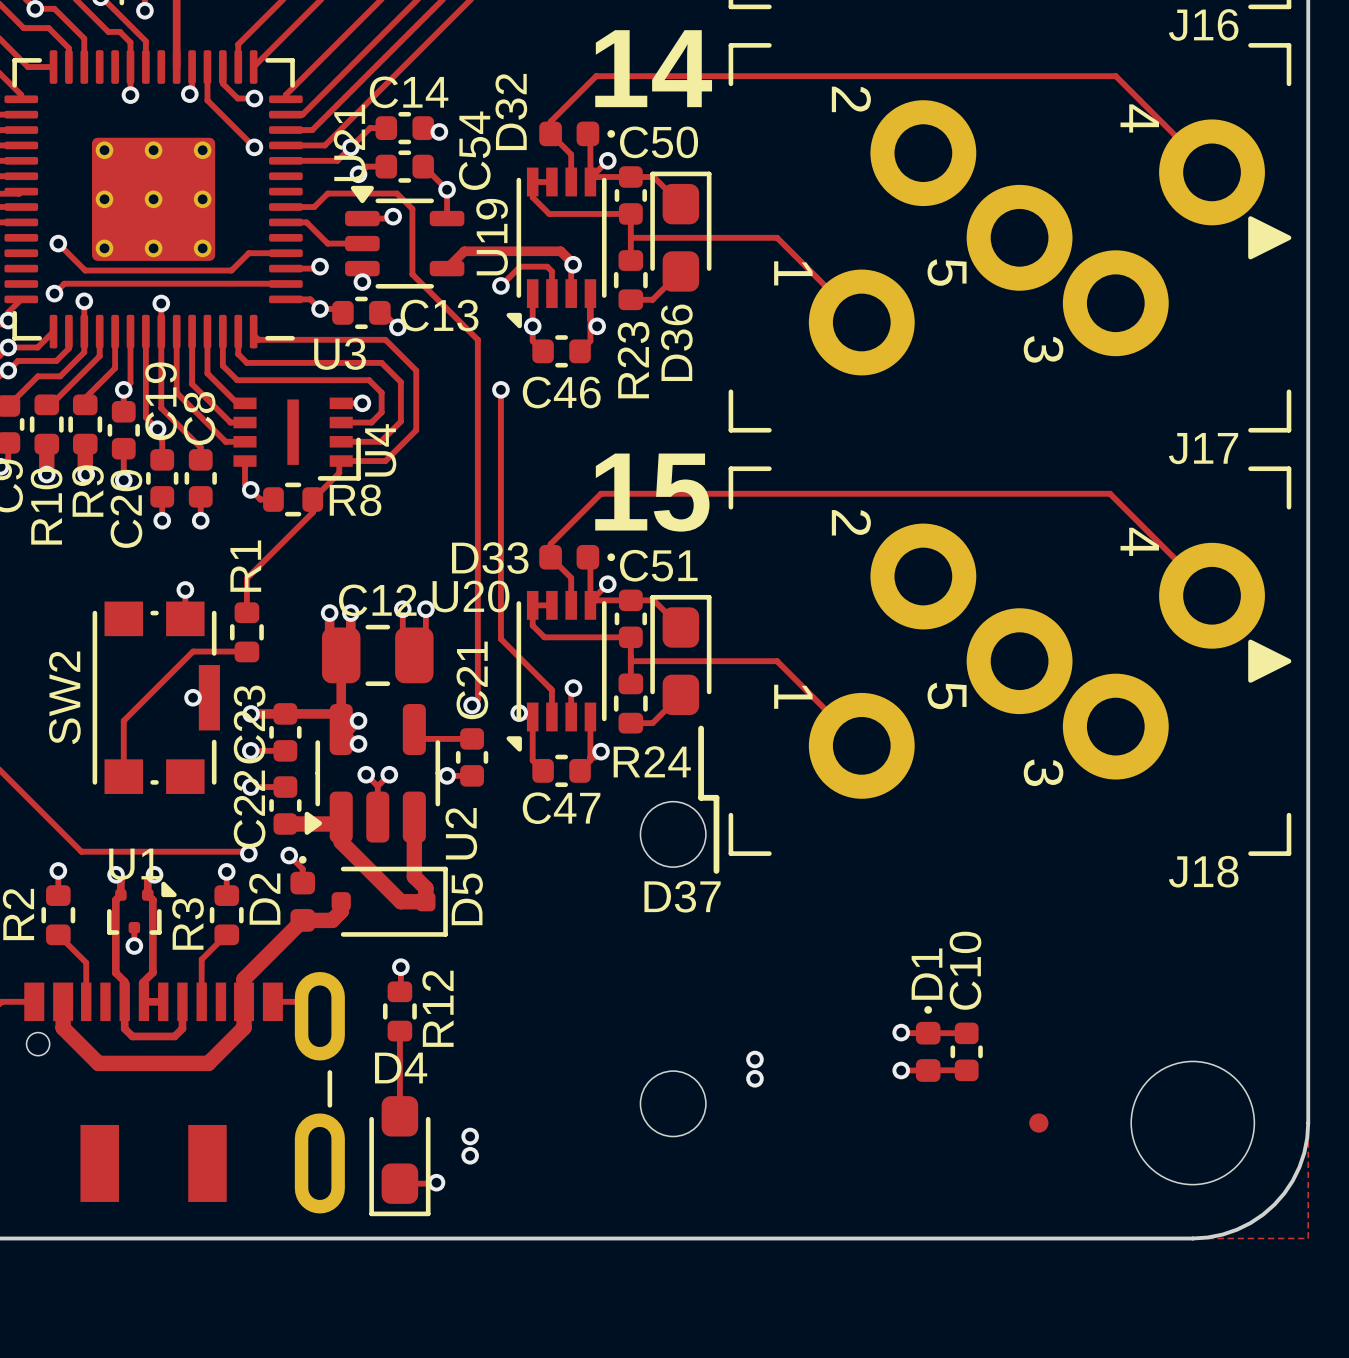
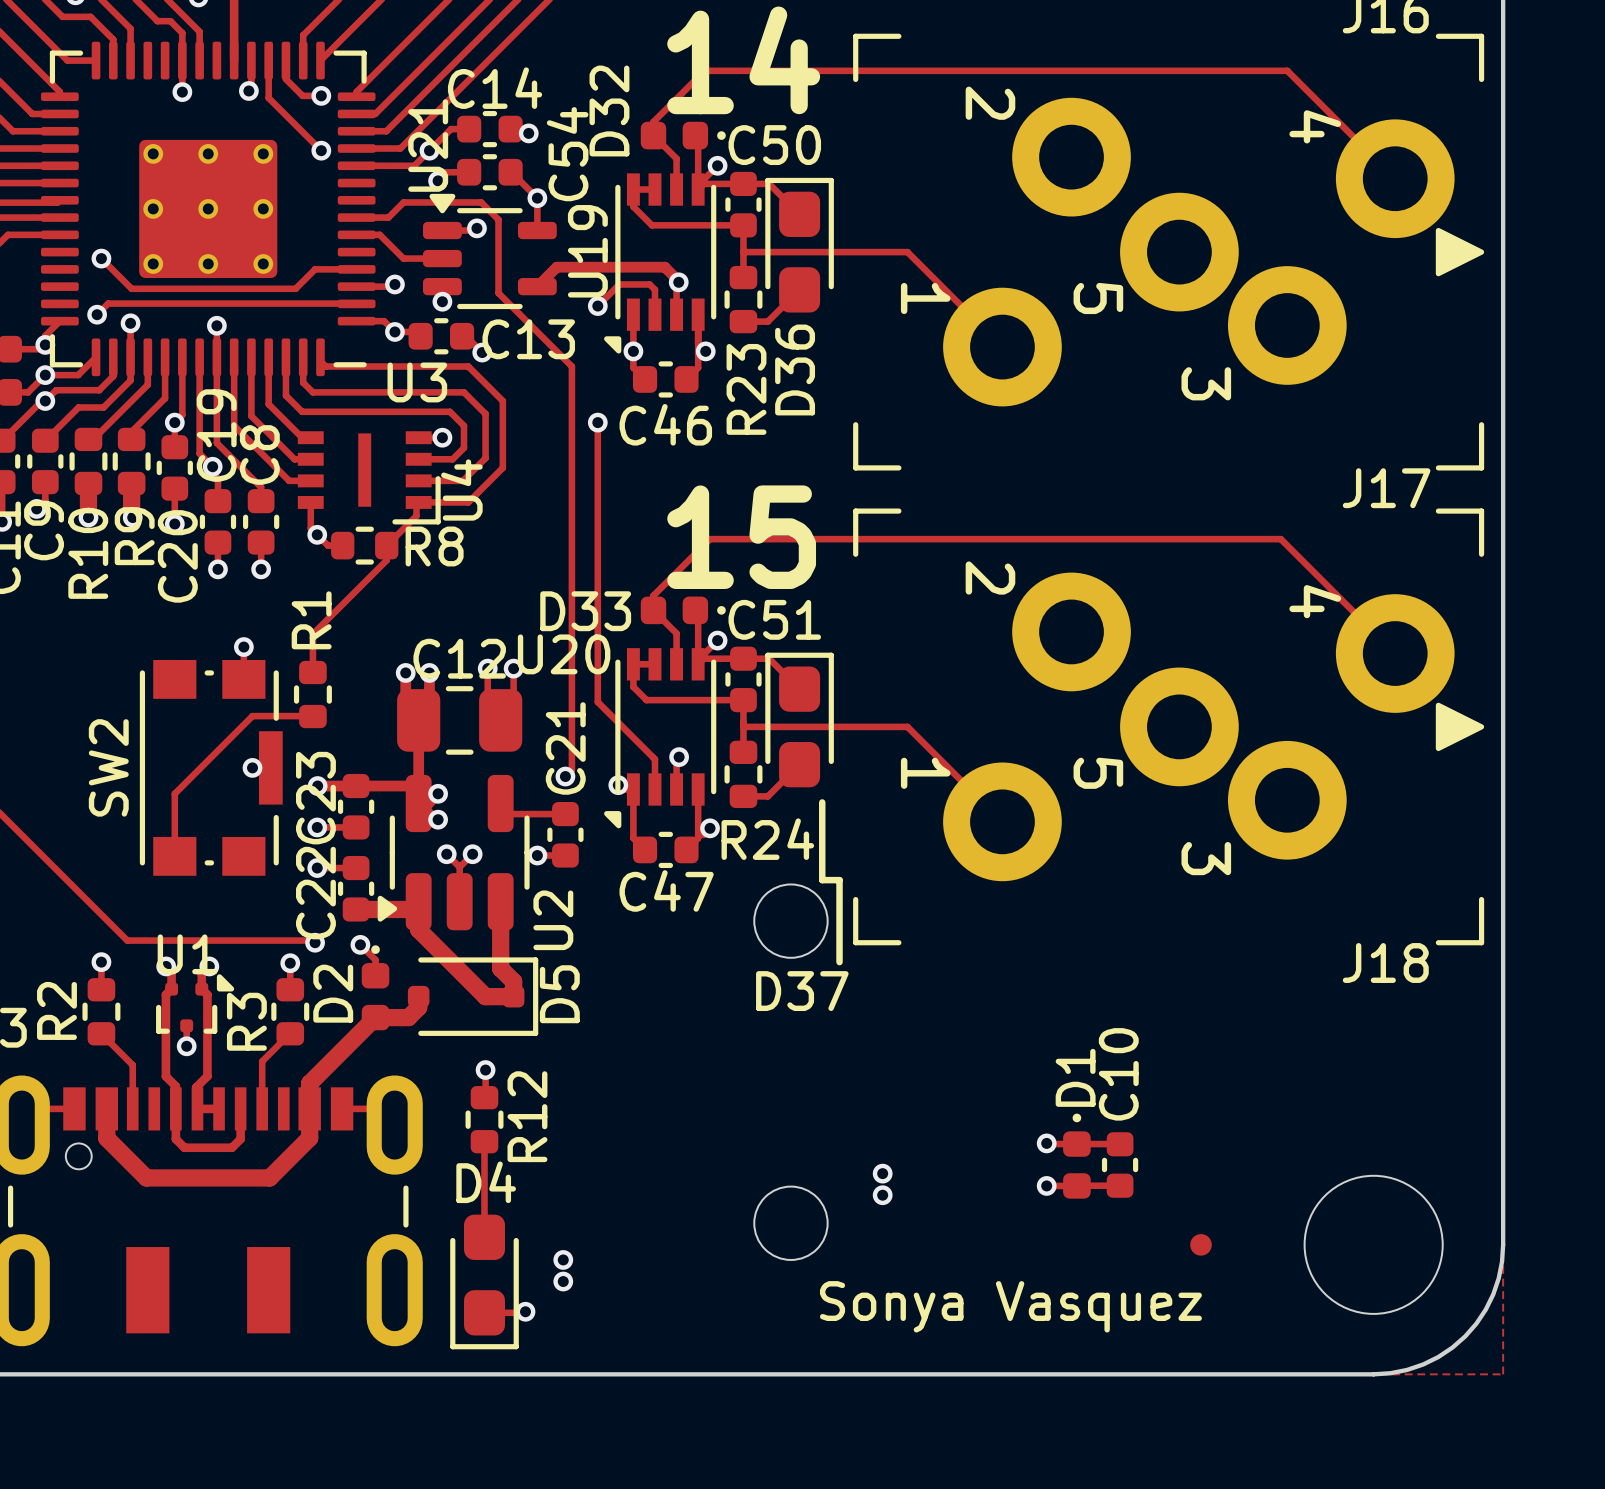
text: none -> Sonya Vasquez (1010, 1306)

